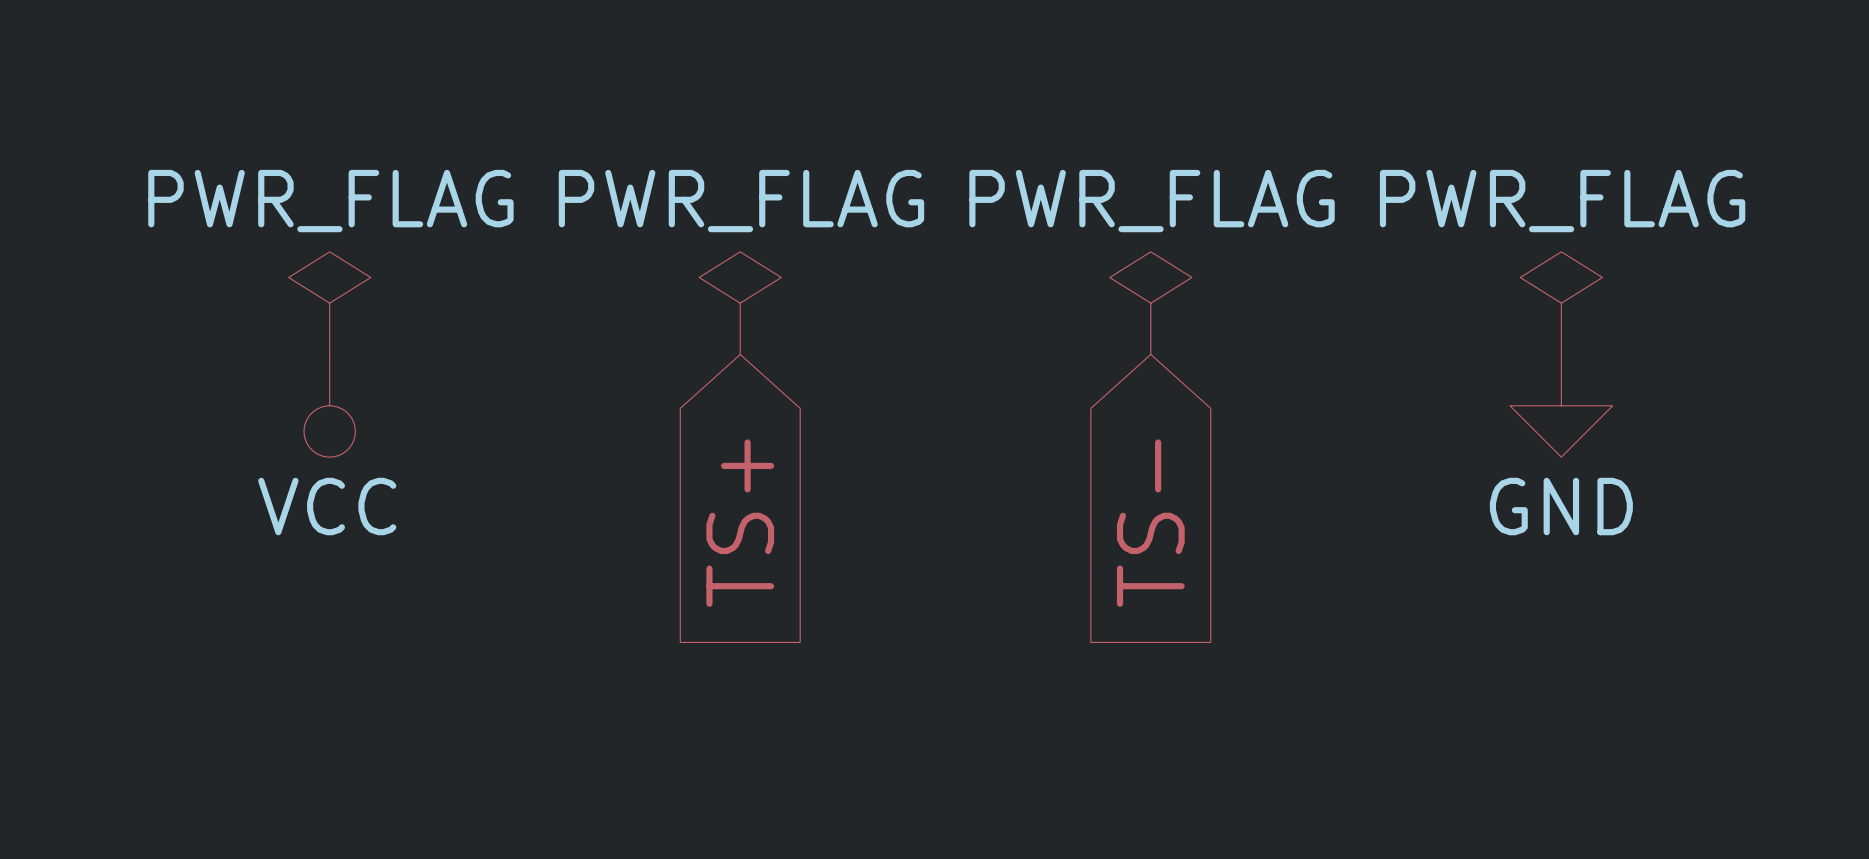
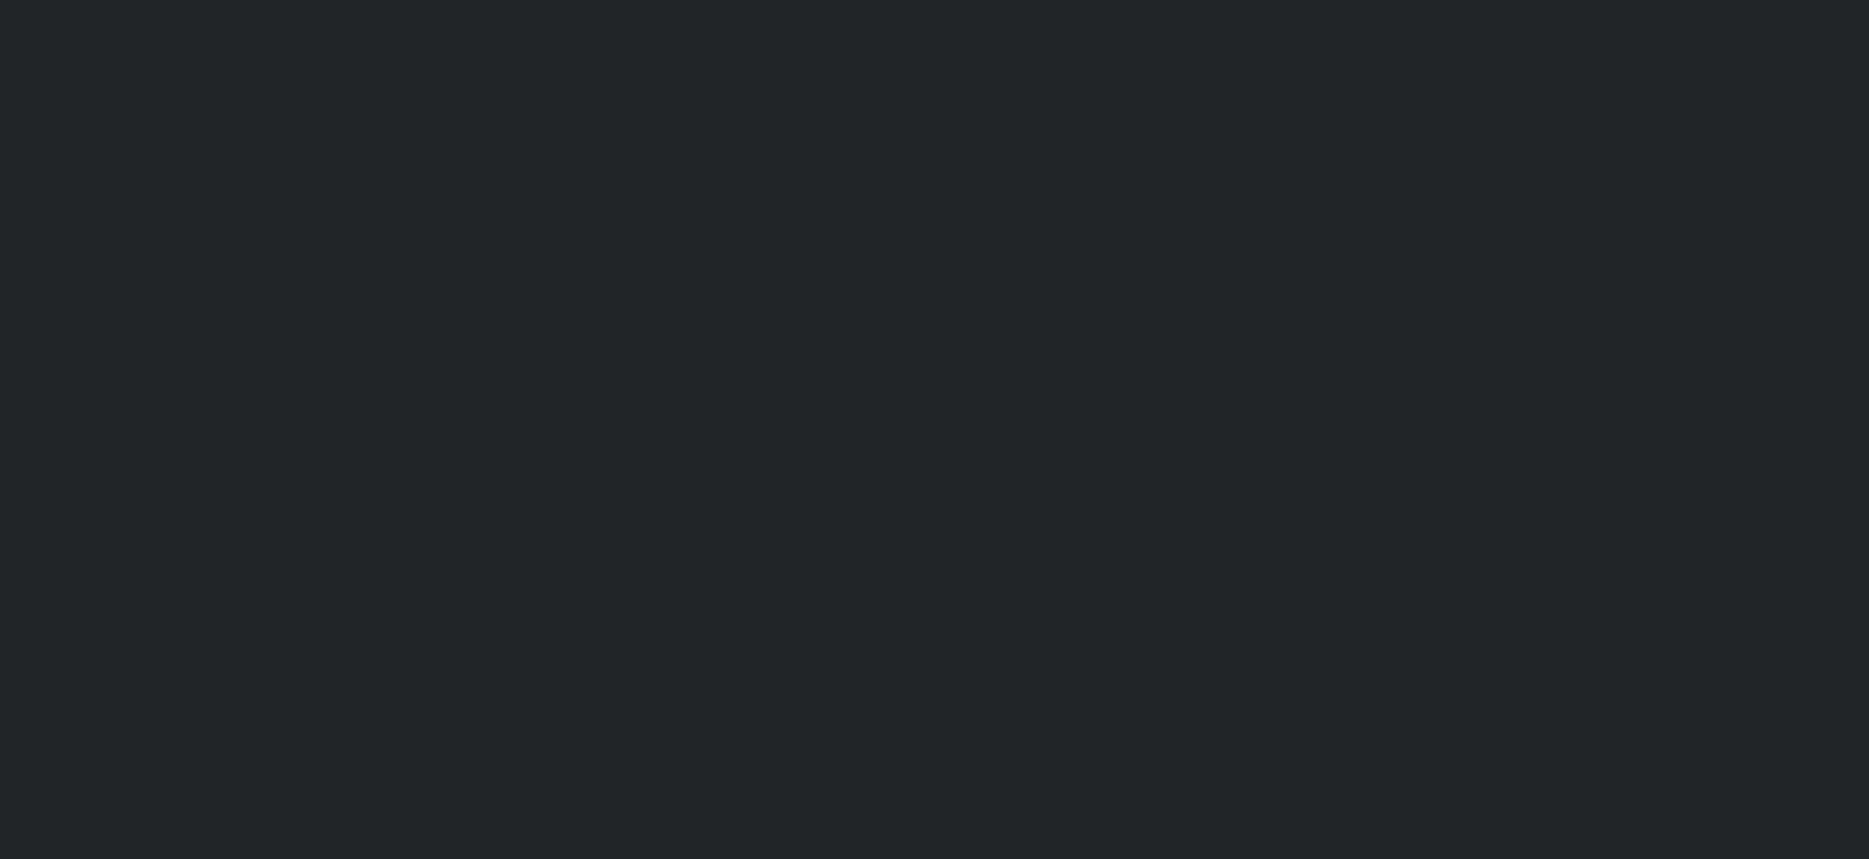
power symbol: PWR_FLAG (329, 303) -> none
power symbol: PWR_FLAG (740, 303) -> none
power symbol: PWR_FLAG (1150, 303) -> none
power symbol: PWR_FLAG (1561, 303) -> none
power symbol: VCC (329, 405) -> none
power symbol: GND (1561, 405) -> none
global label: TS+ (740, 523) -> none
global label: TS- (1150, 523) -> none

